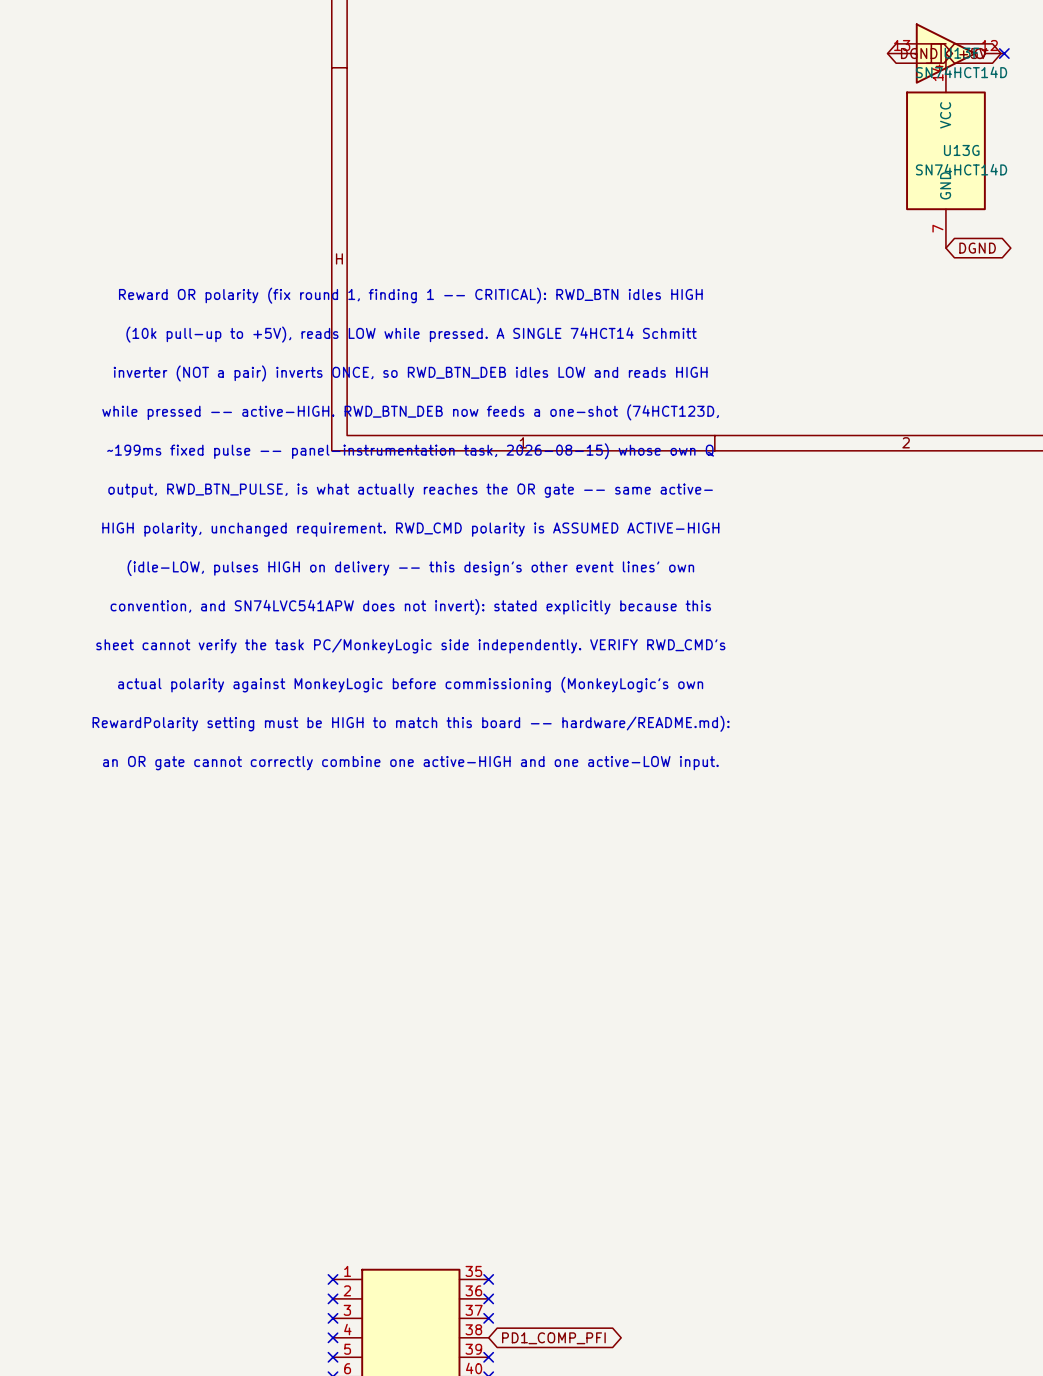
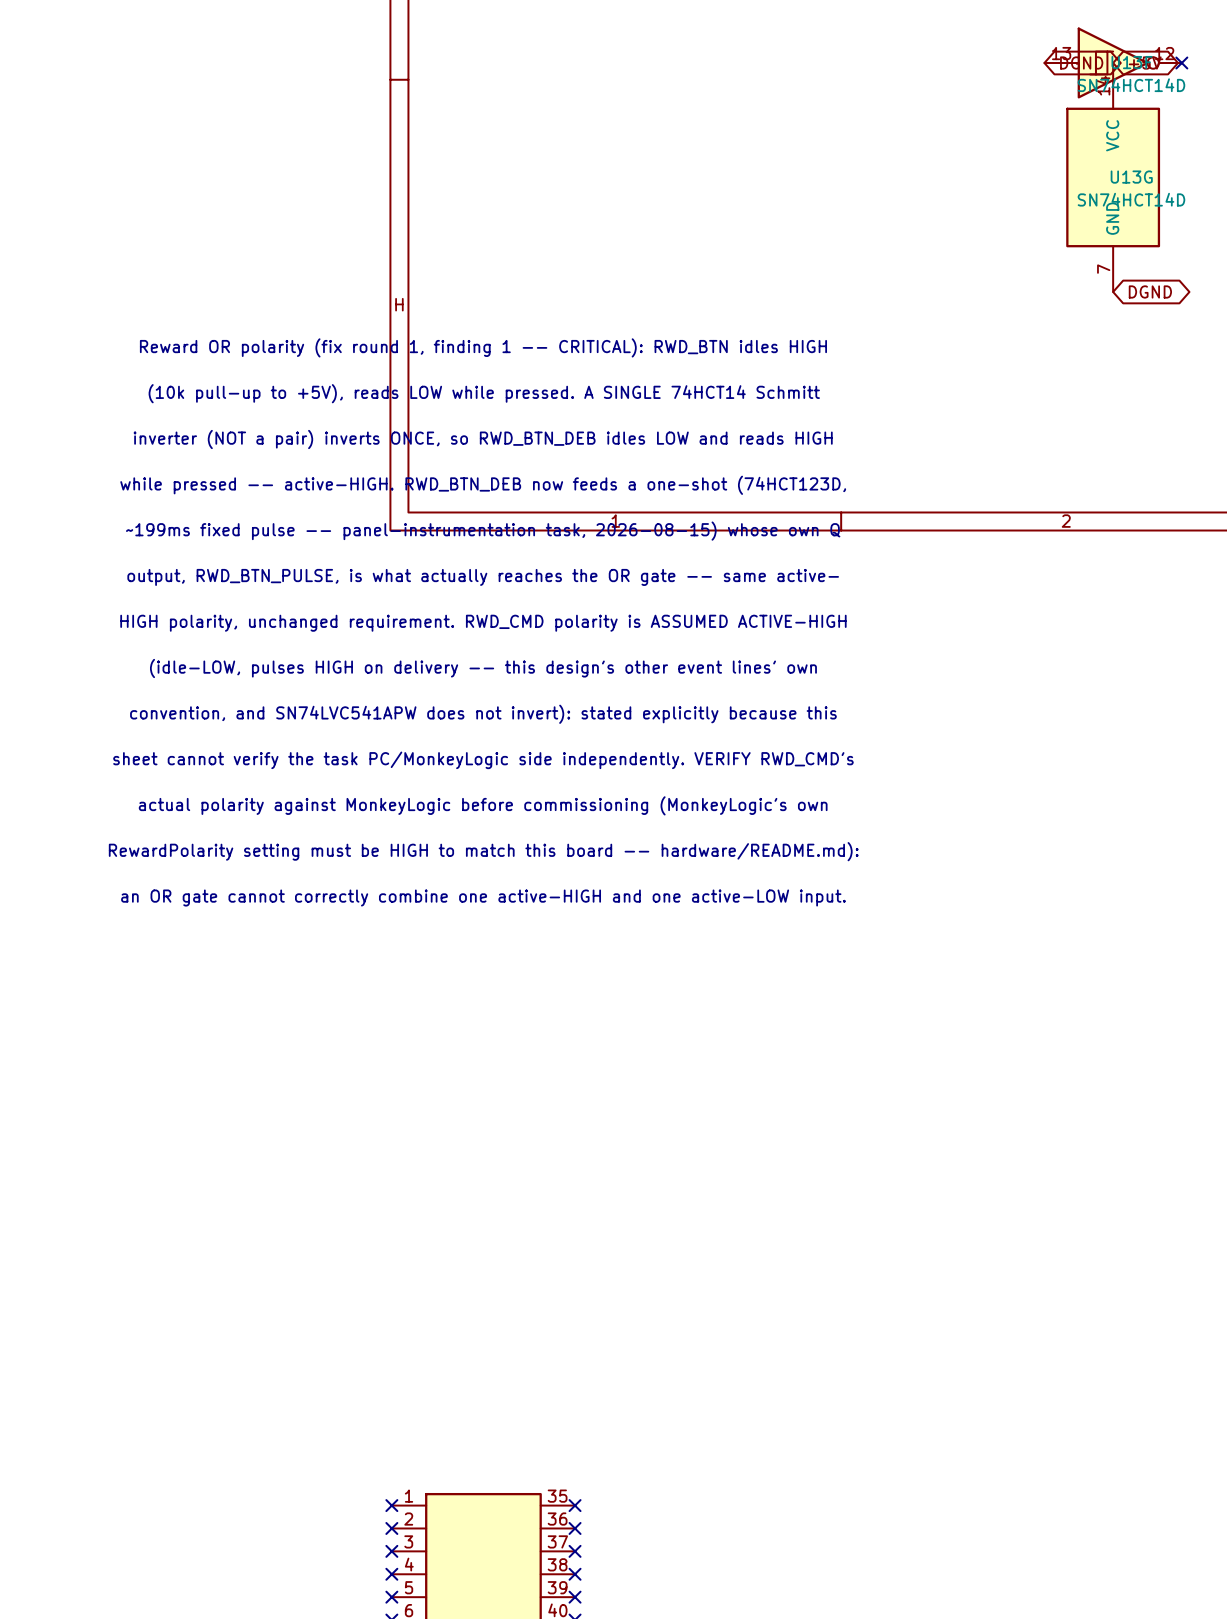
no-connect mark: none -> (575, 1574)
global label: PD1_COMP_PFI (553, 1338) -> none

